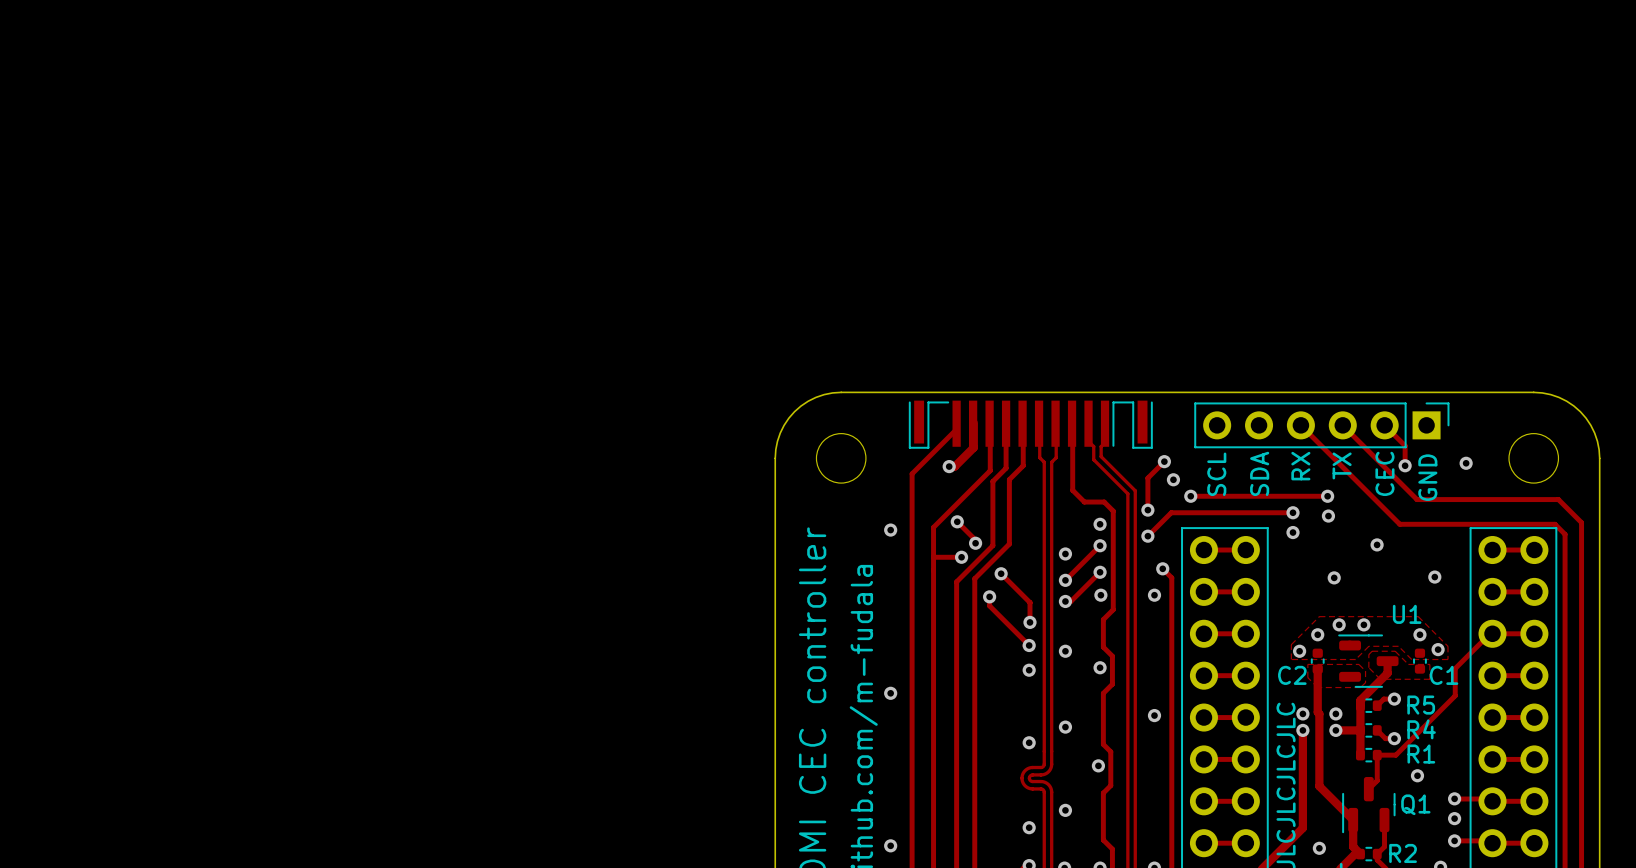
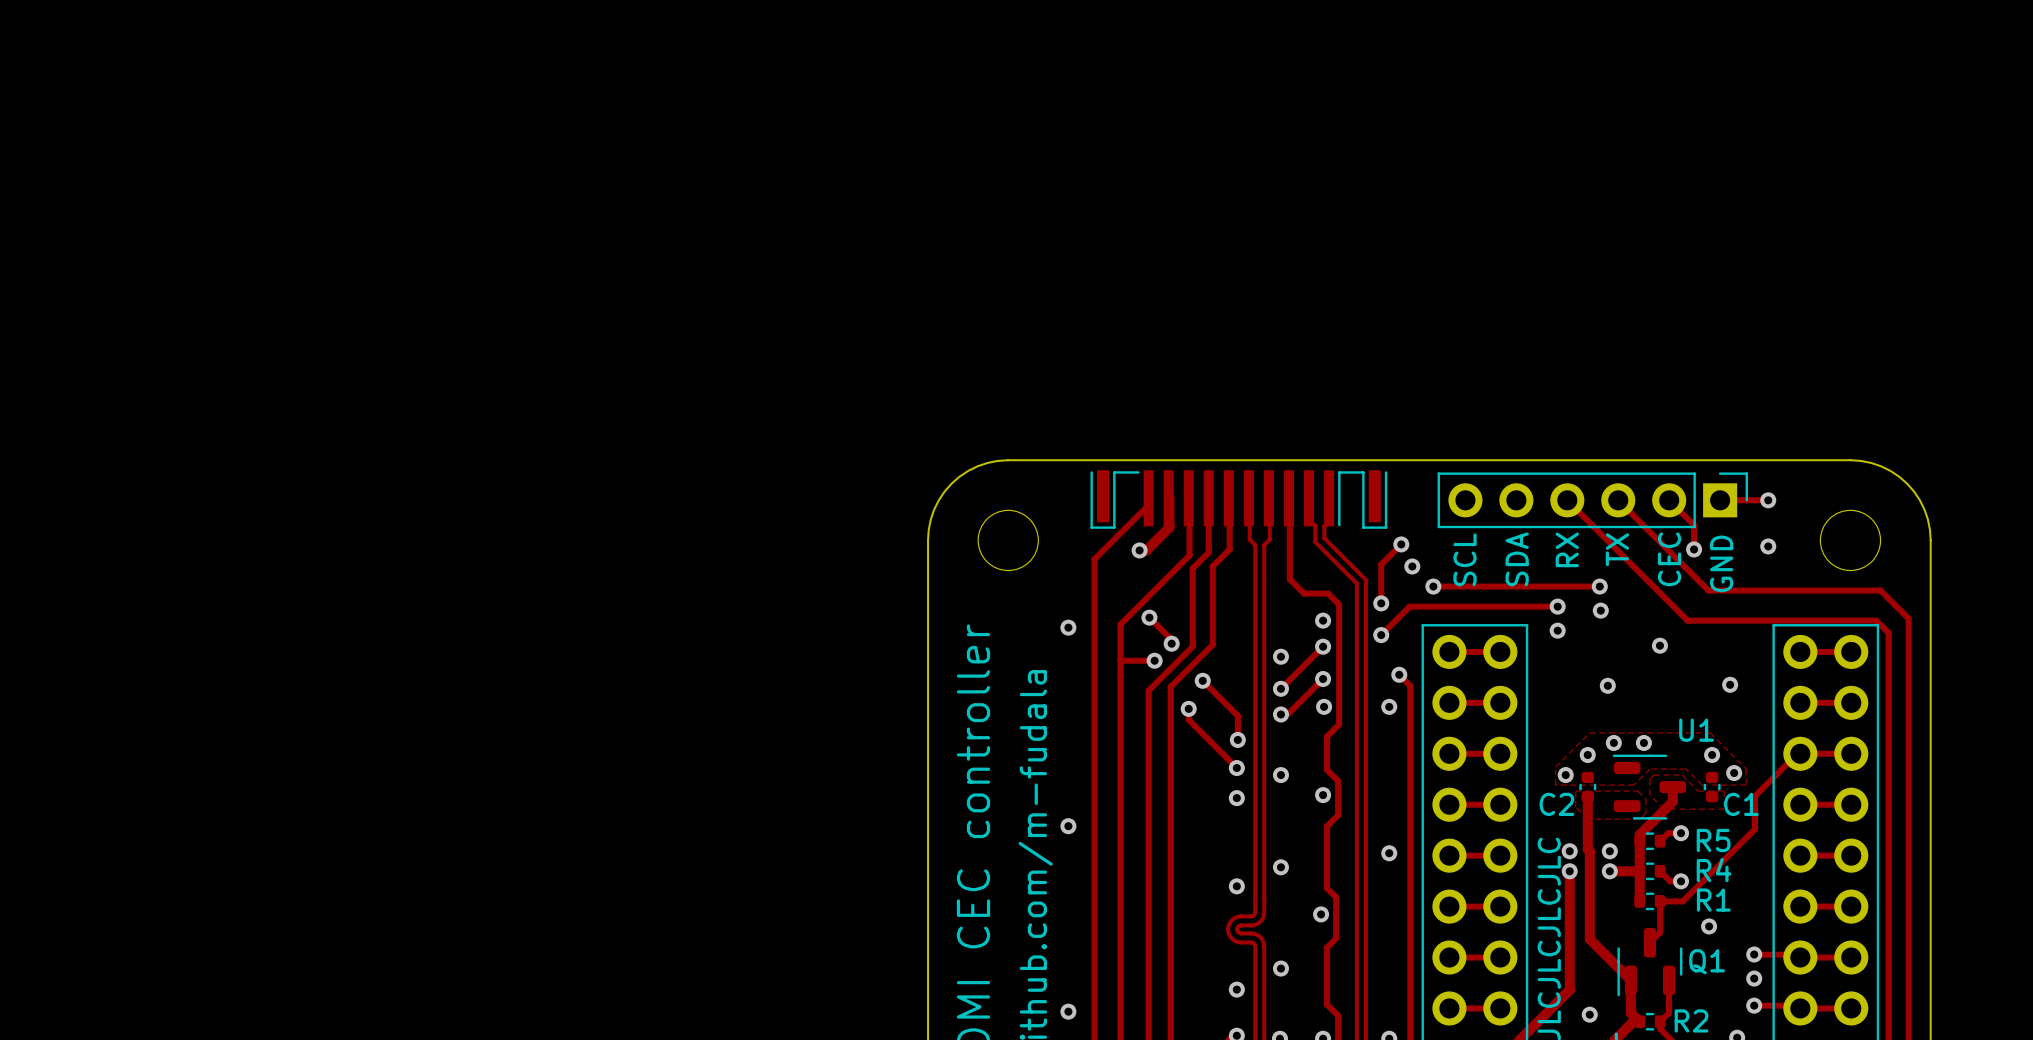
track: none -> (1720, 500) (1768, 500)
via: none -> (1768, 500)

